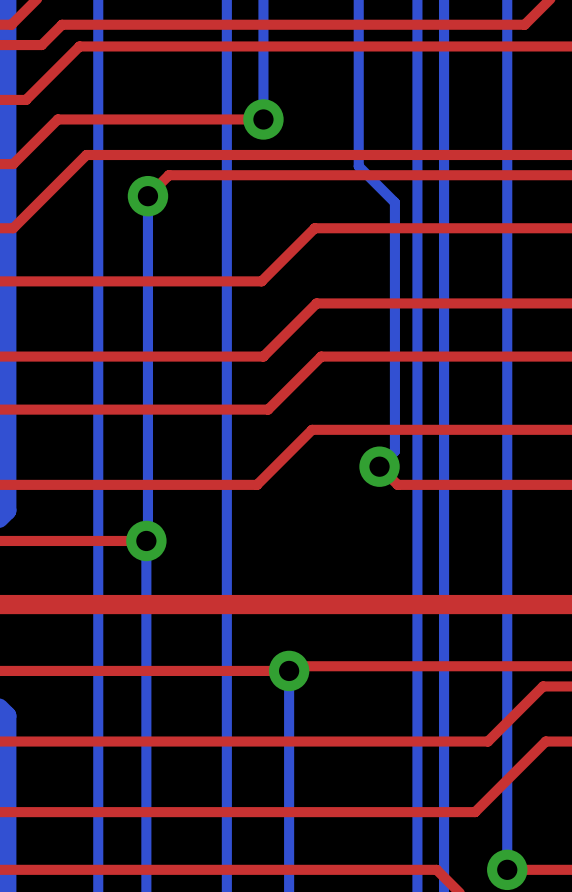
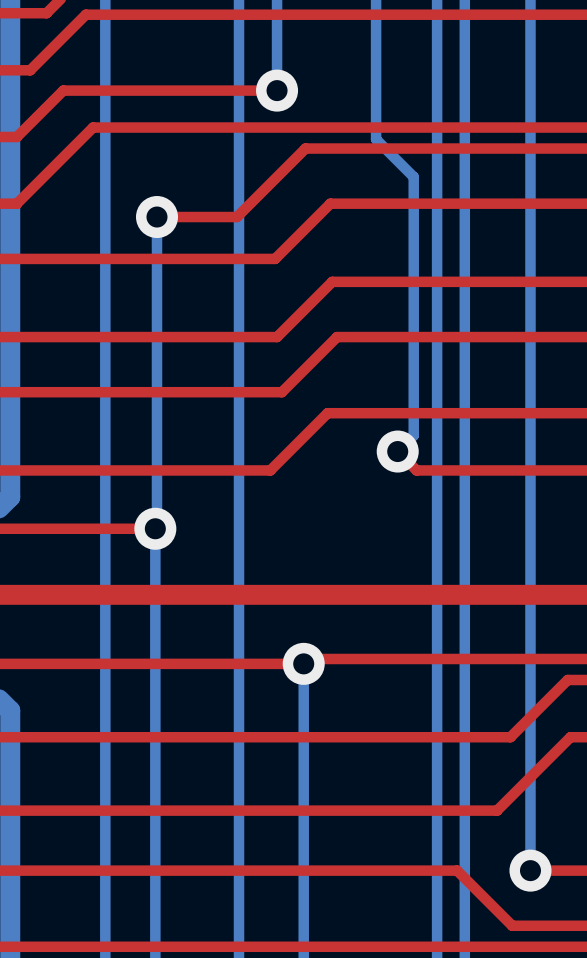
top track: (290, 175) (168, 175) (147, 196) -> (305, 148) (237, 217) (156, 217)
bottom track: (147, 196) (147, 241) -> none
via position: (147, 196) -> (156, 217)

